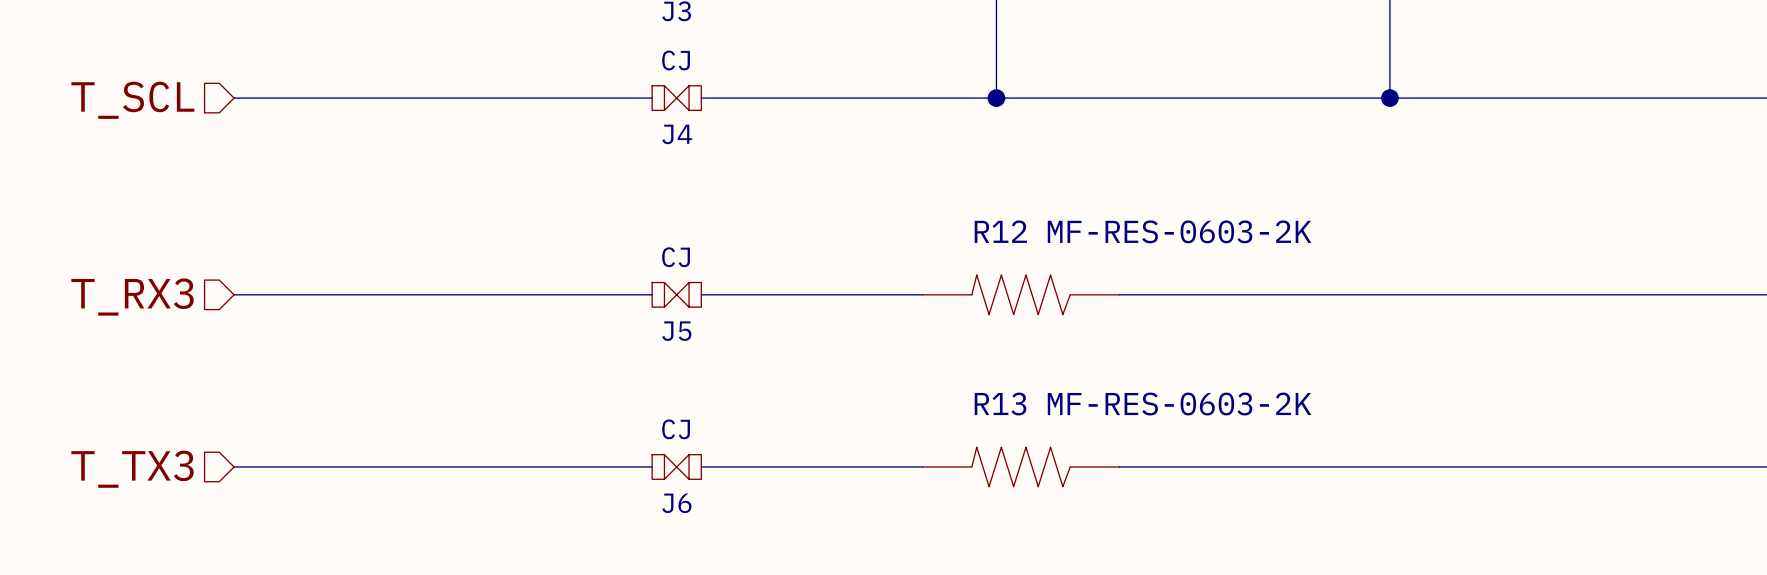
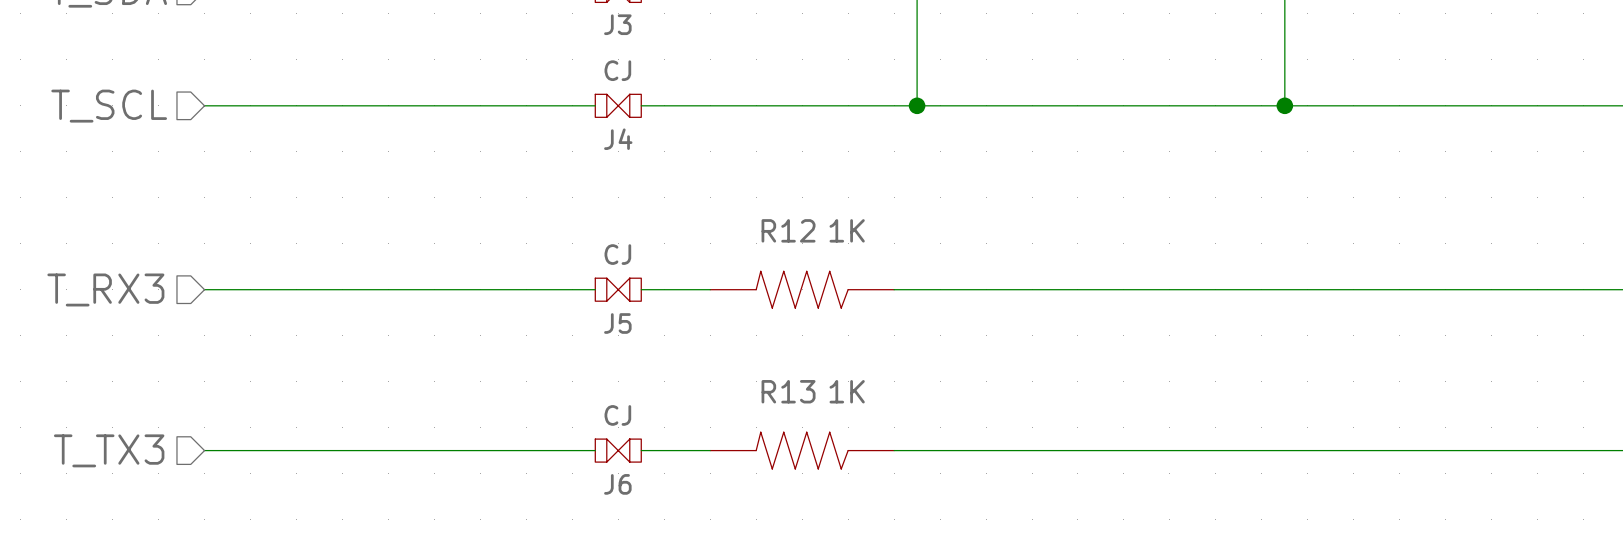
R12 value: MF-RES-0603-2K (1179, 231) -> 1K (847, 230)
wire: (775, 294) (922, 294) -> (894, 289) (1032, 289)
R12 position: (1021, 294) -> (802, 289)
R13 value: MF-RES-0603-2K (1179, 404) -> 1K (847, 391)
wire: (775, 466) (922, 466) -> (894, 450) (1032, 450)
R13 position: (1021, 466) -> (802, 450)

